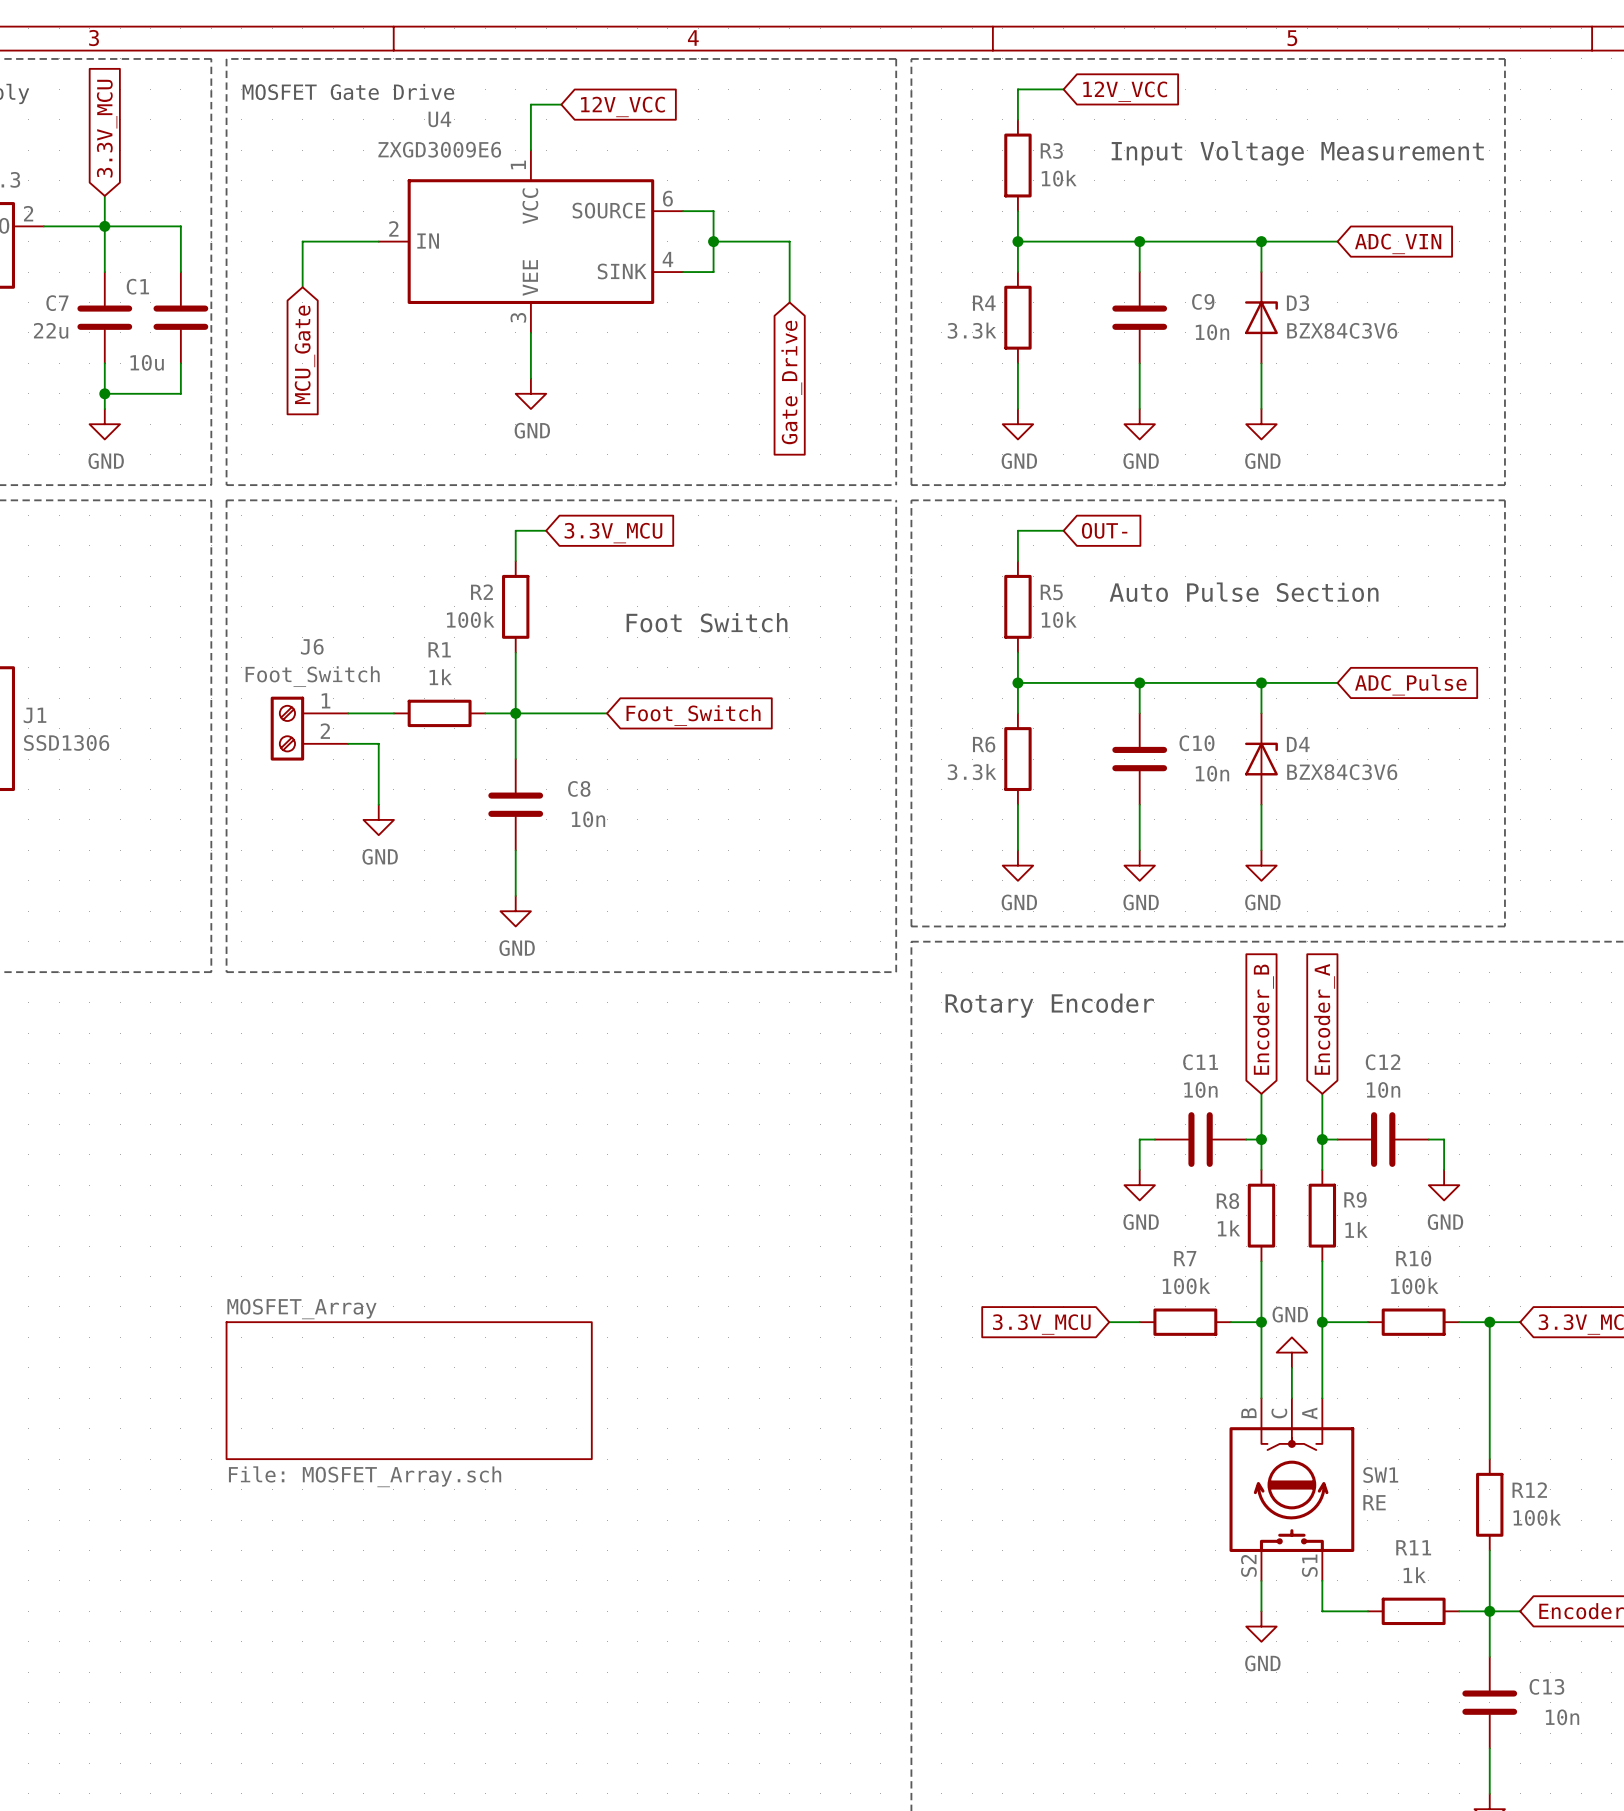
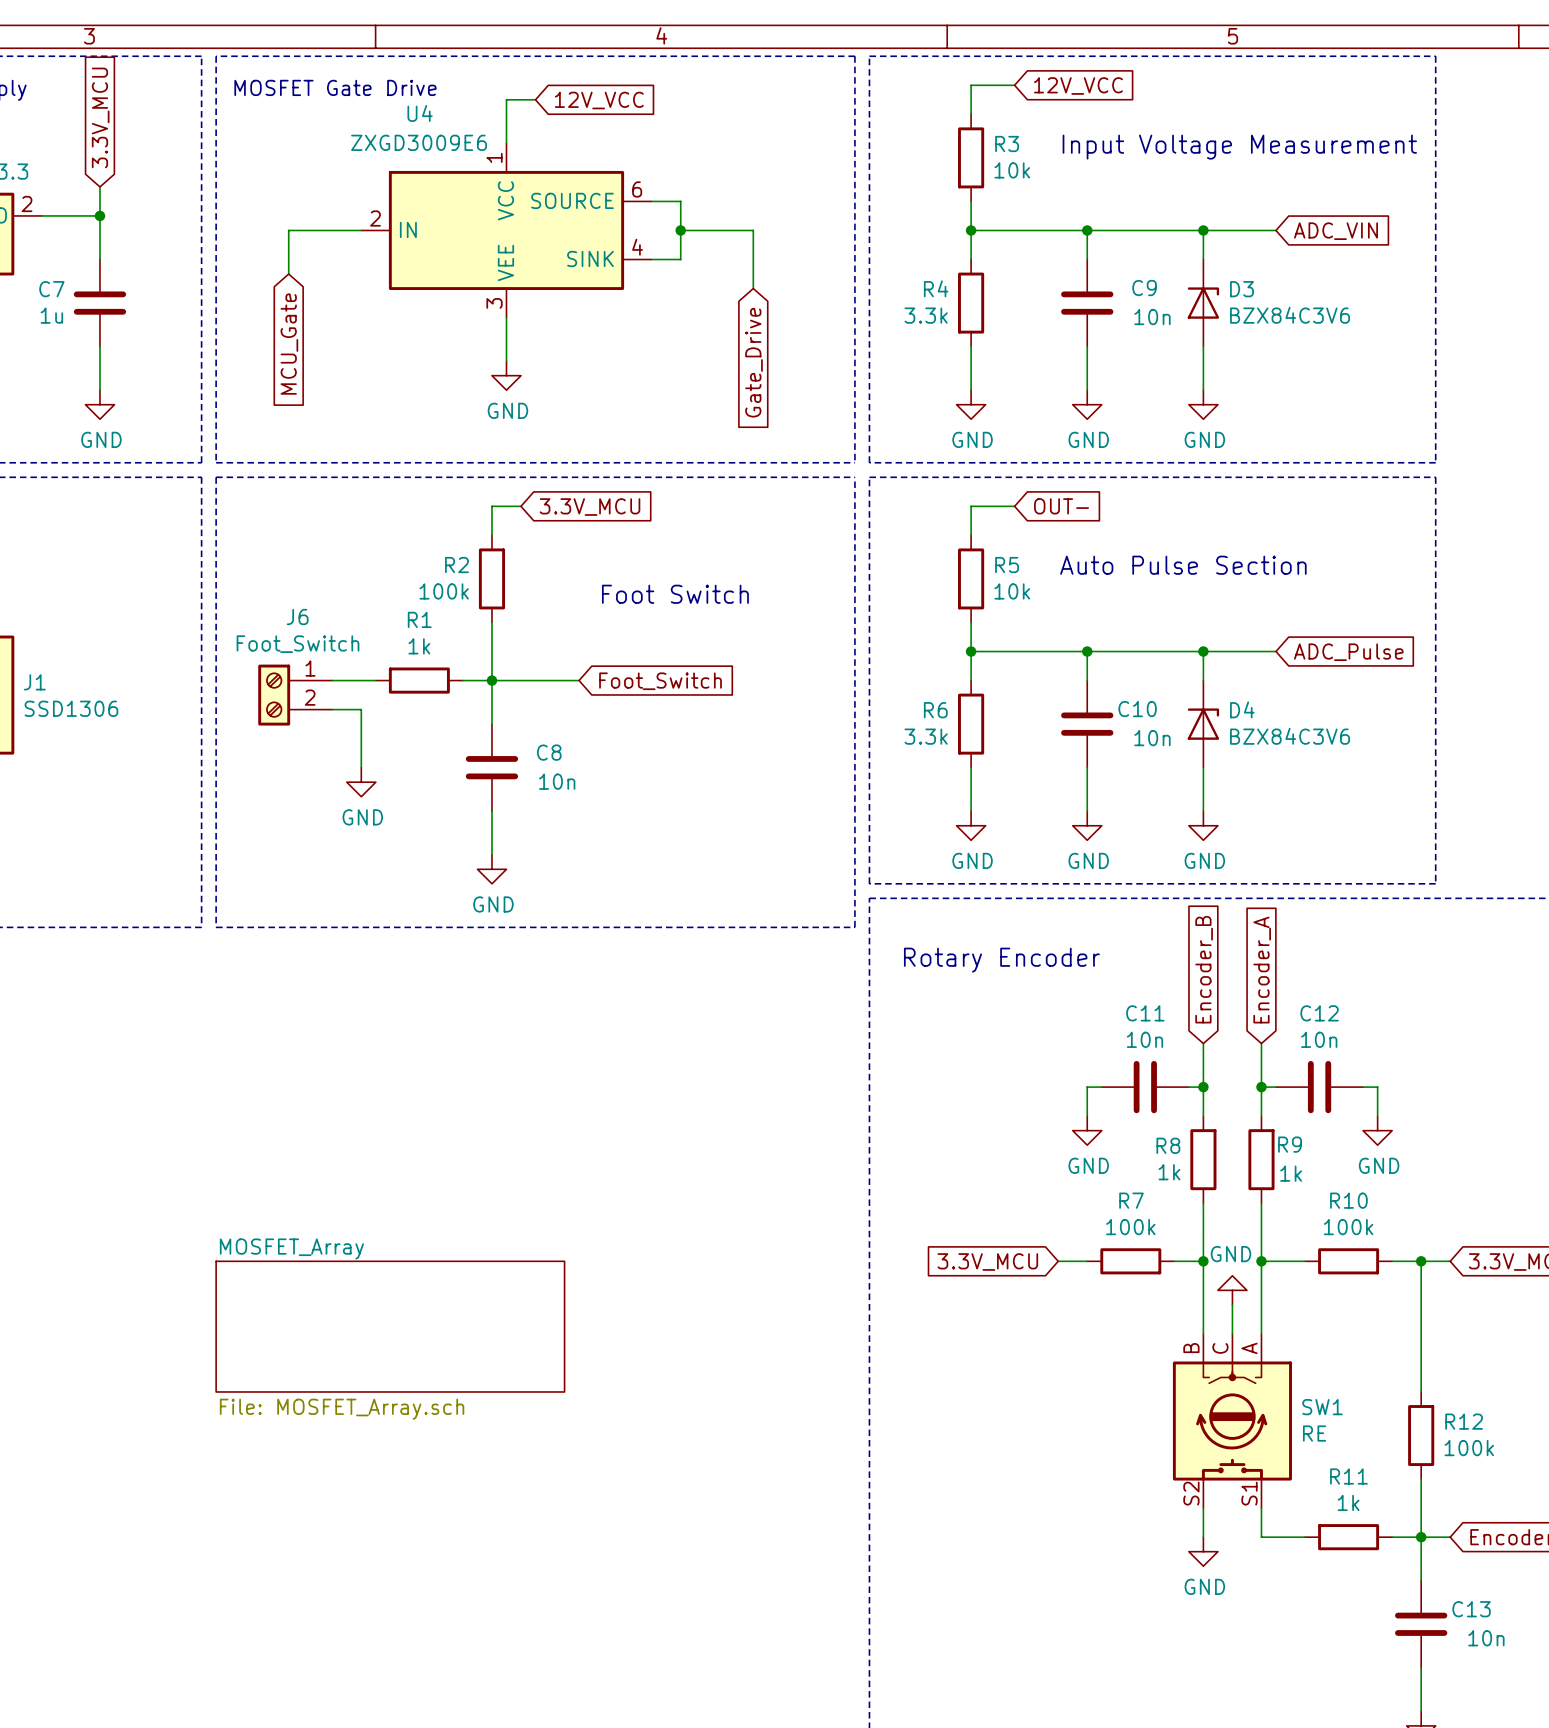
wire: (104, 226) (180, 226) (180, 272) -> none
C1: 10u (180, 317) -> none
C7 value: 22u (51, 330) -> 1u (51, 315)
wire: (180, 363) (180, 393) (104, 393) -> none
junction: (104, 393) -> none

